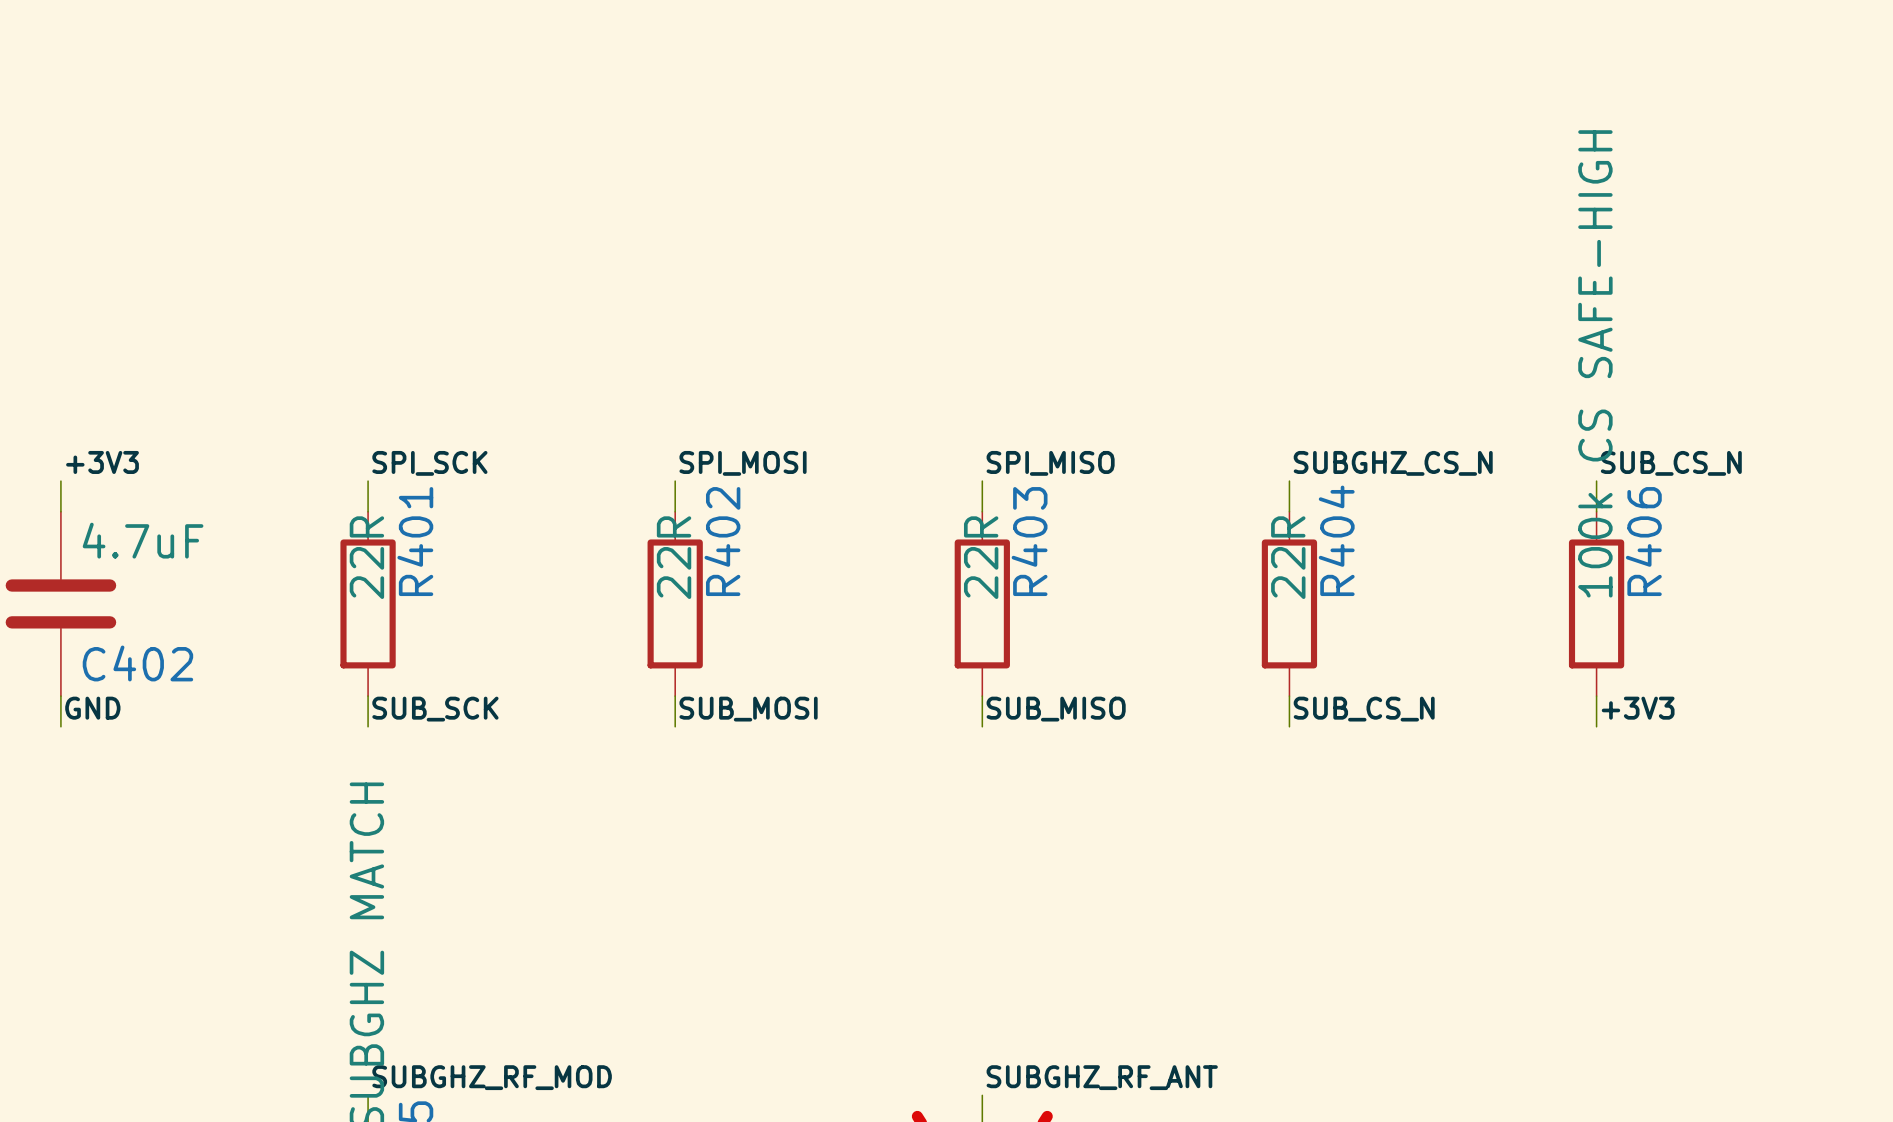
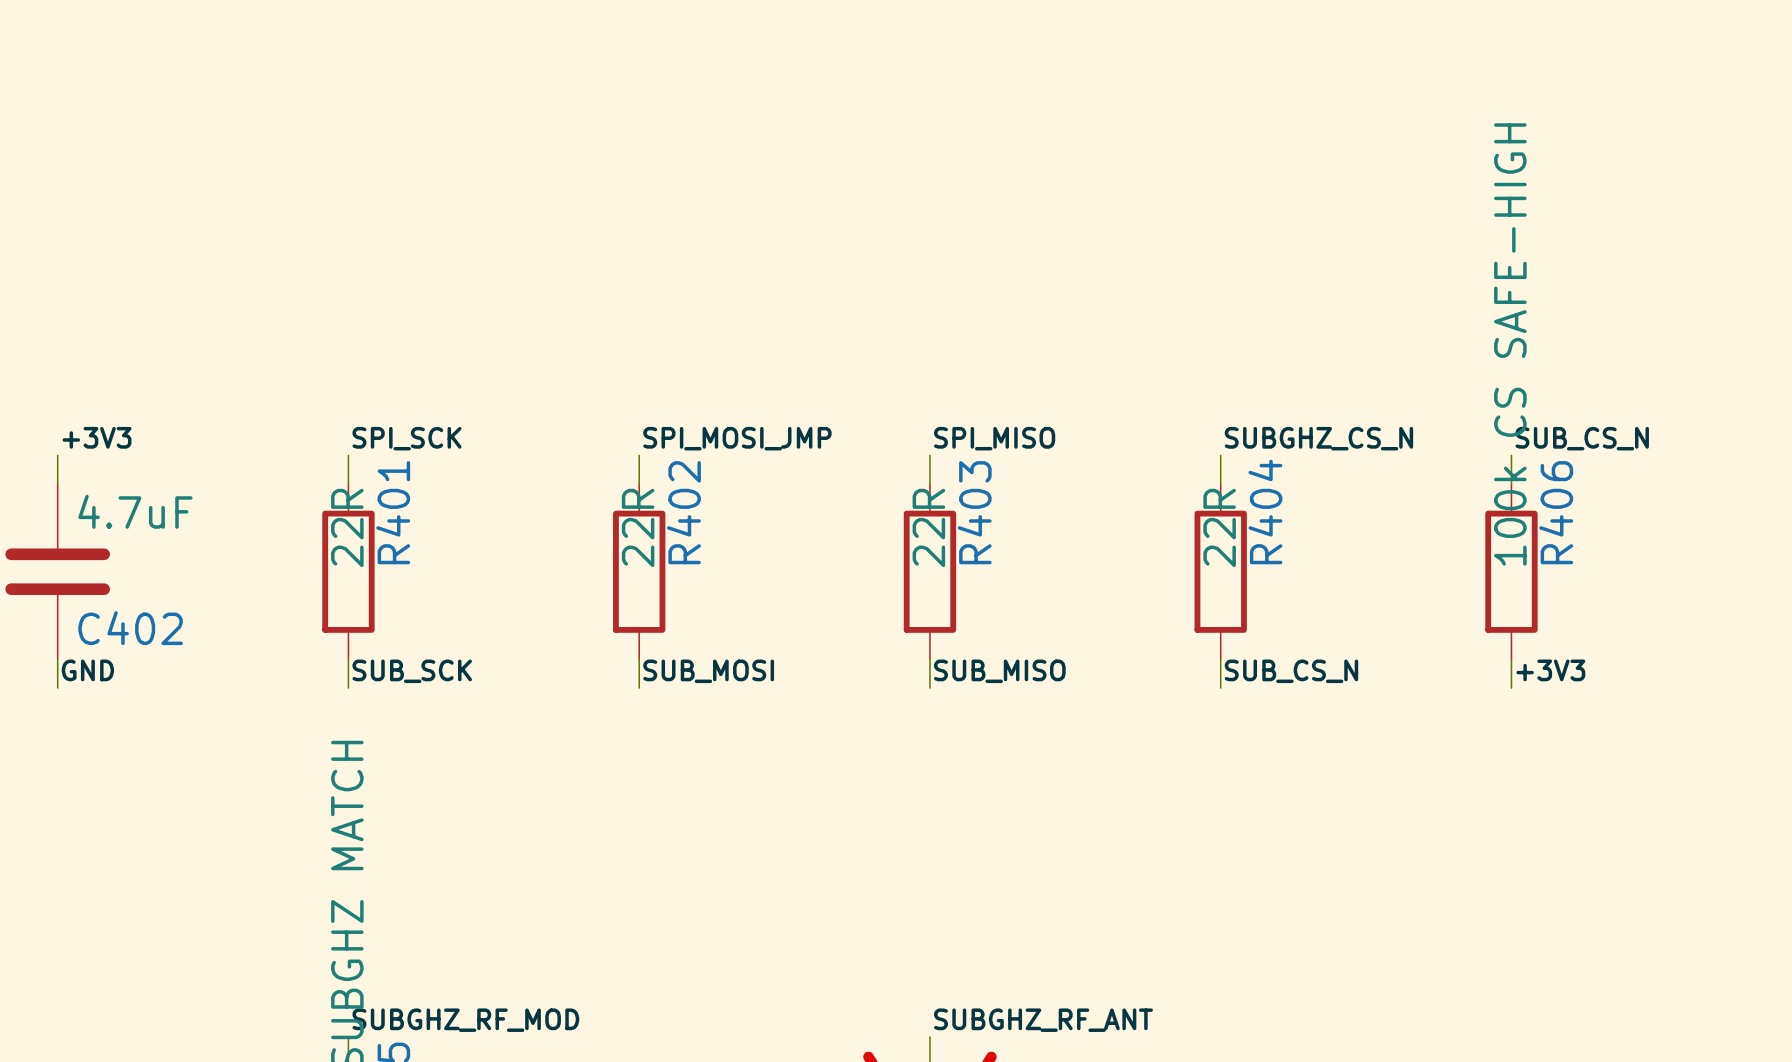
label: SPI_MOSI (743, 463) -> SPI_MOSI_JMP (737, 438)

